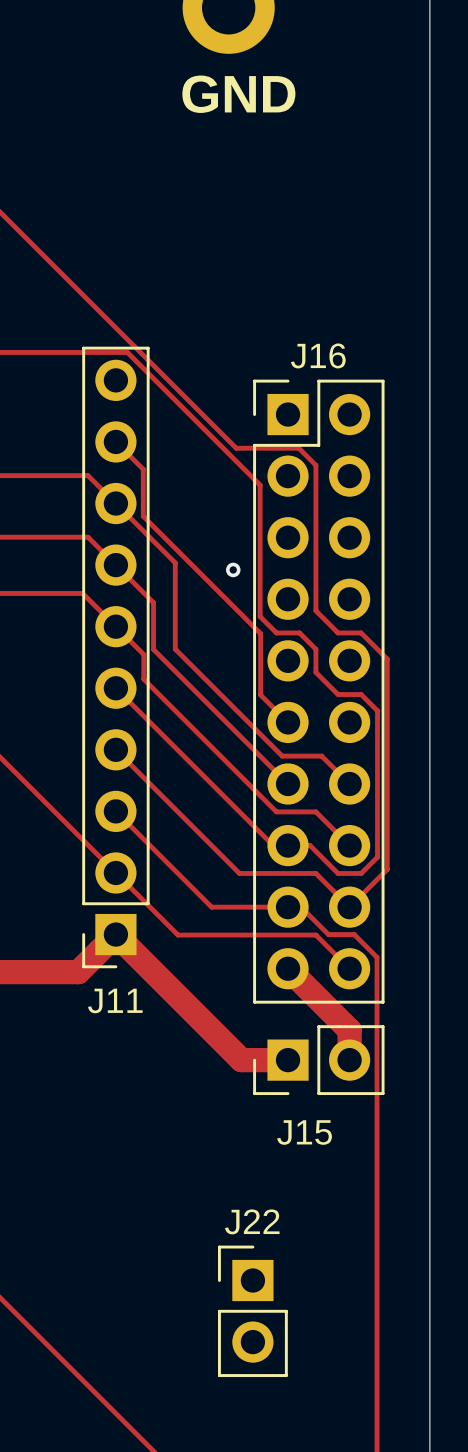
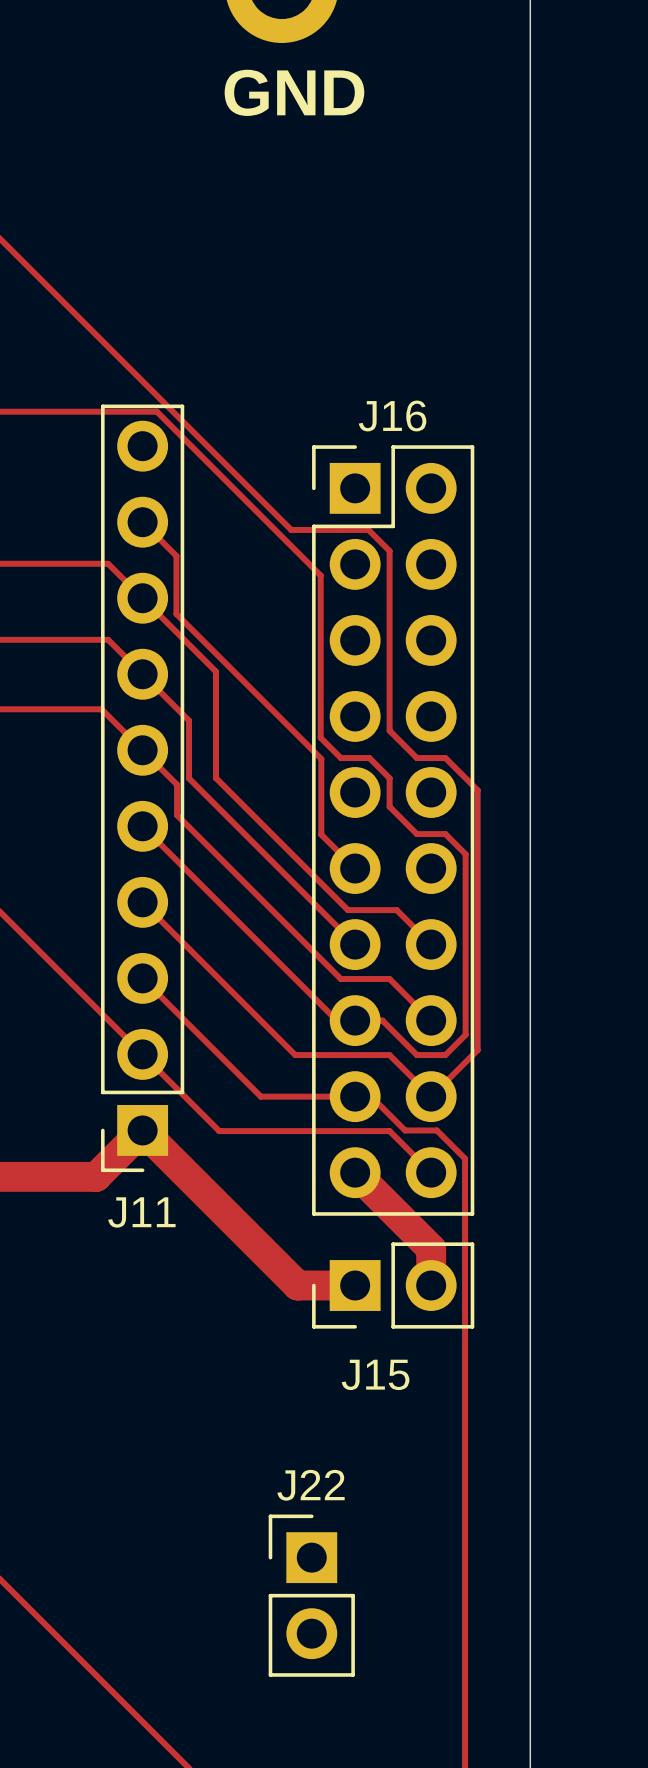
via: (233, 569) -> none

